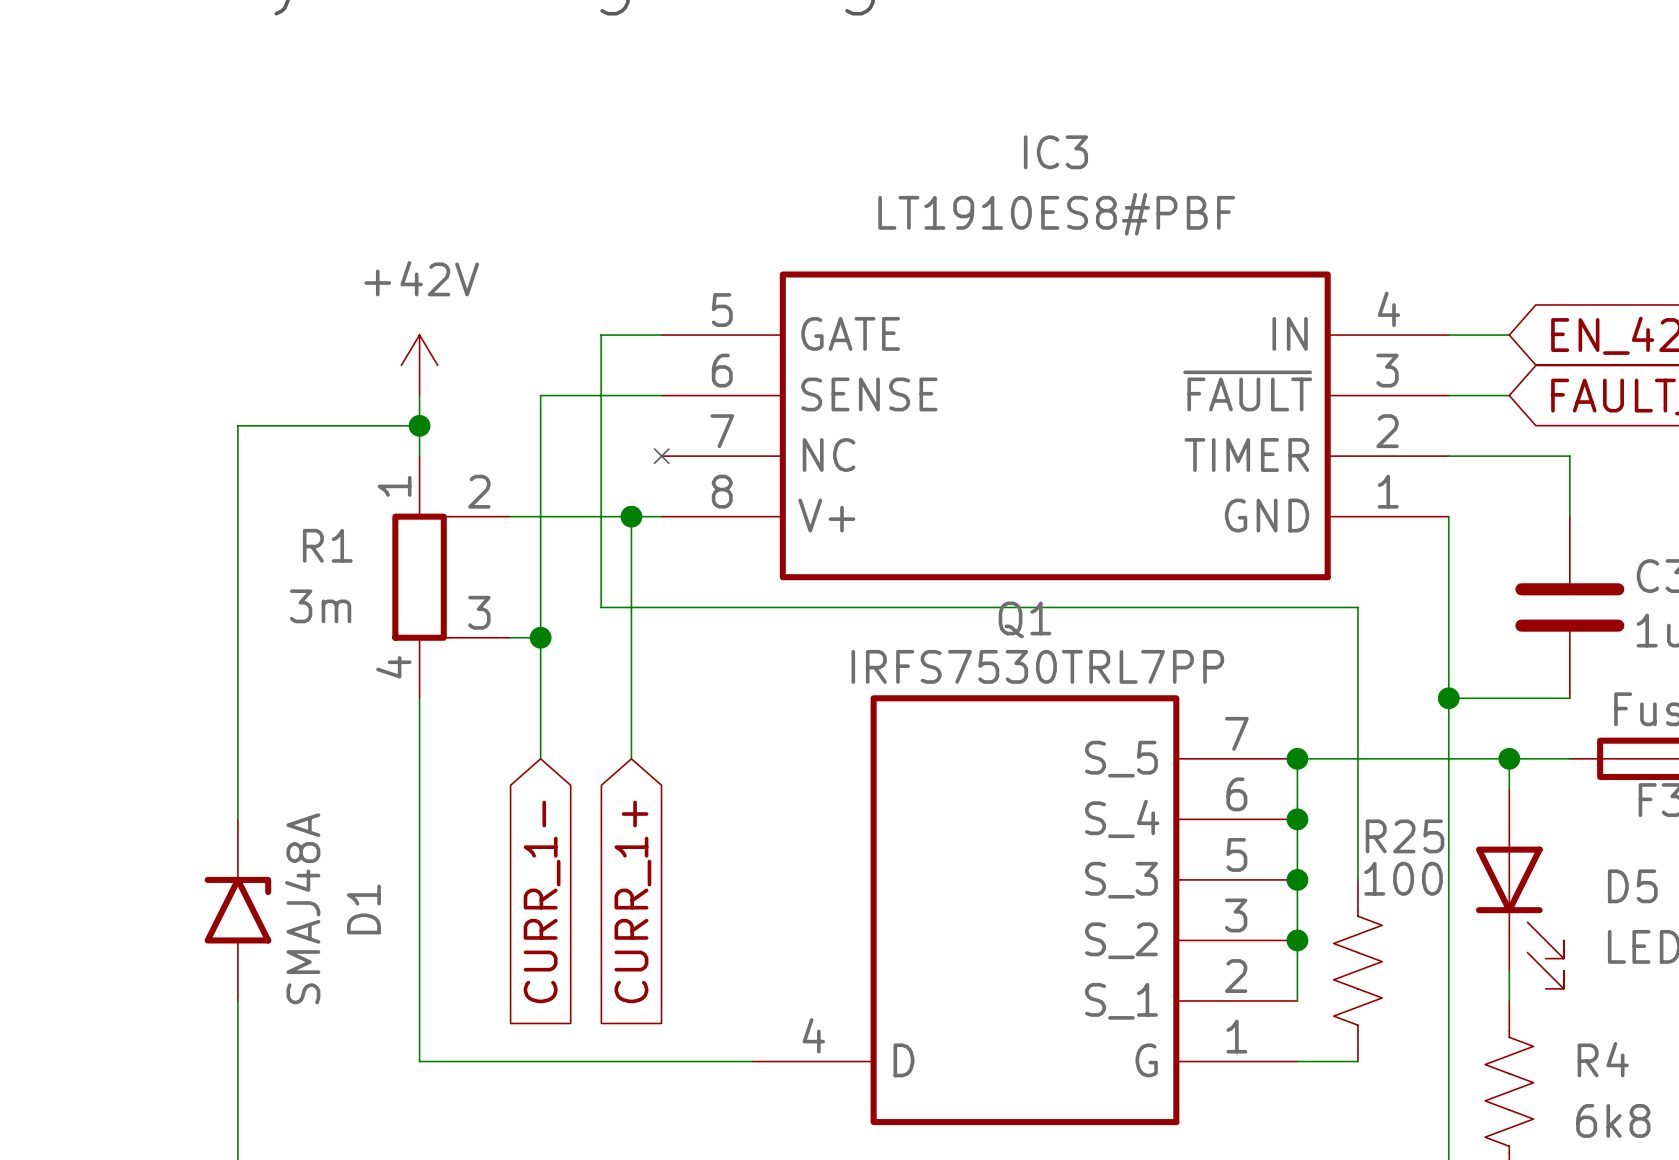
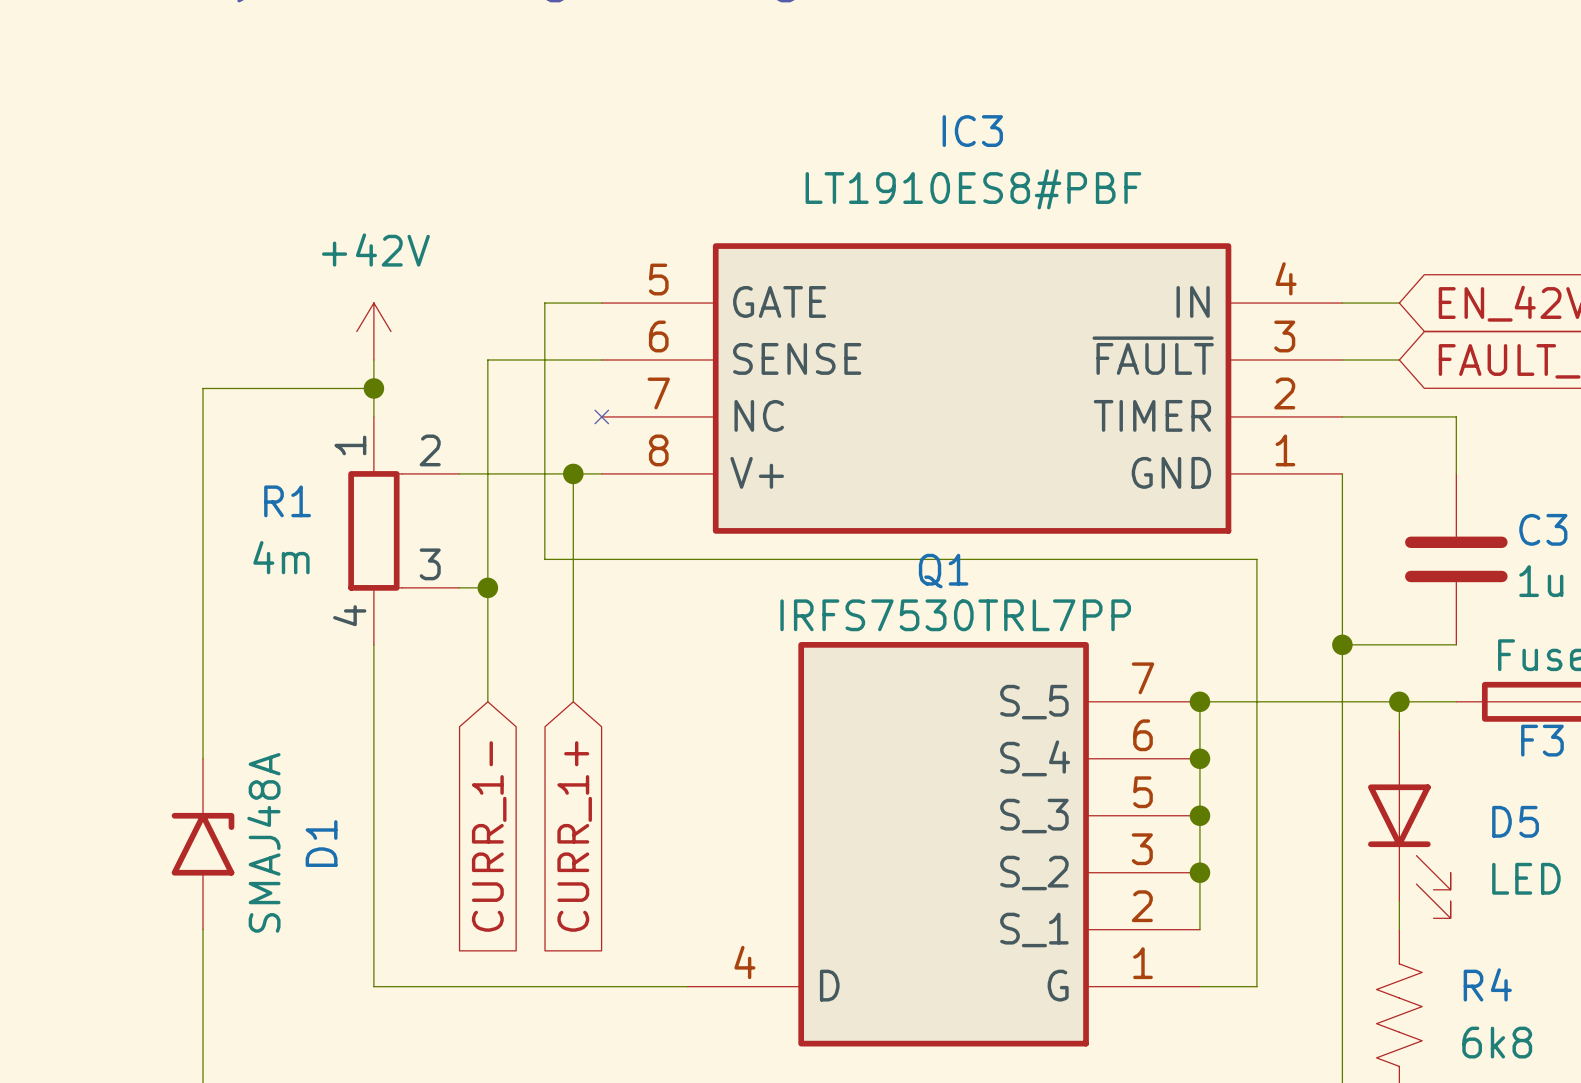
R1 value: 3m (320, 606) -> 4m (281, 557)
wire: none -> (1256, 815) (1256, 986)
R25: 100 (1357, 970) -> none

